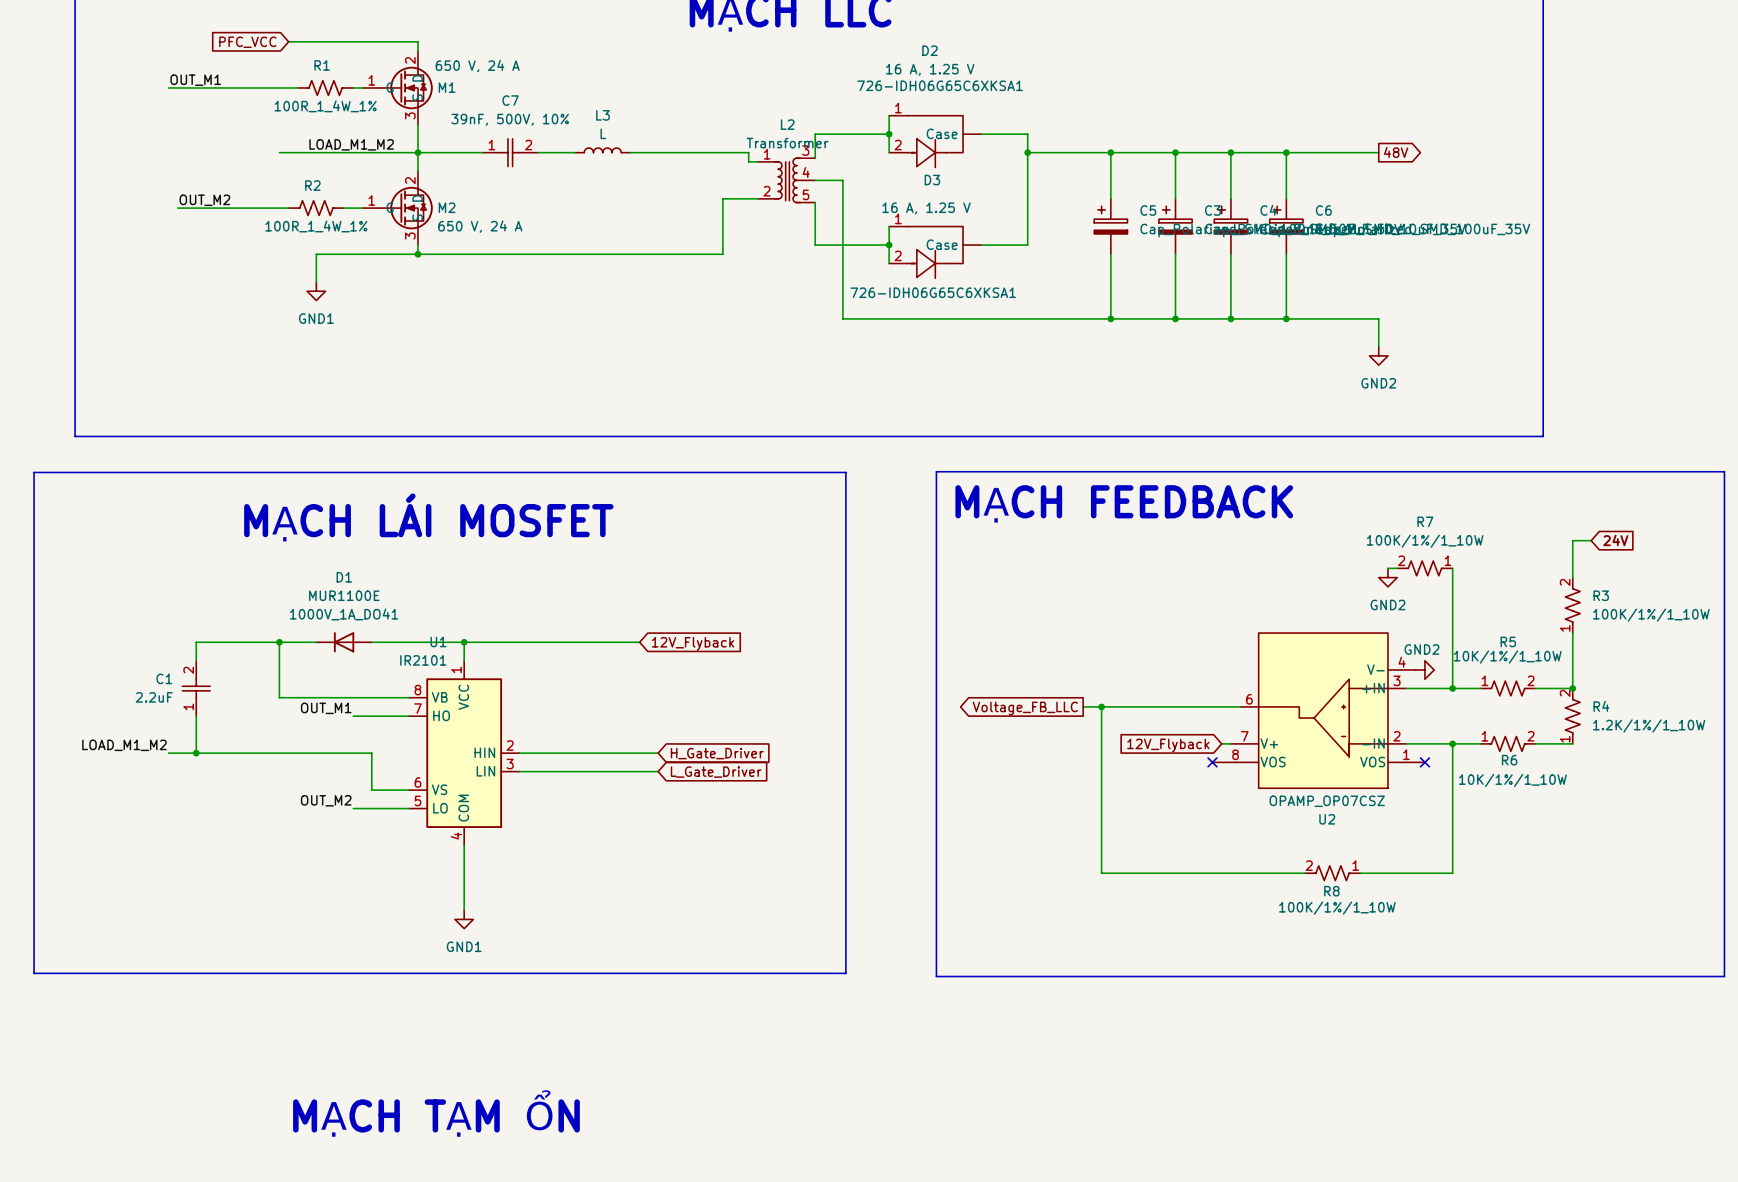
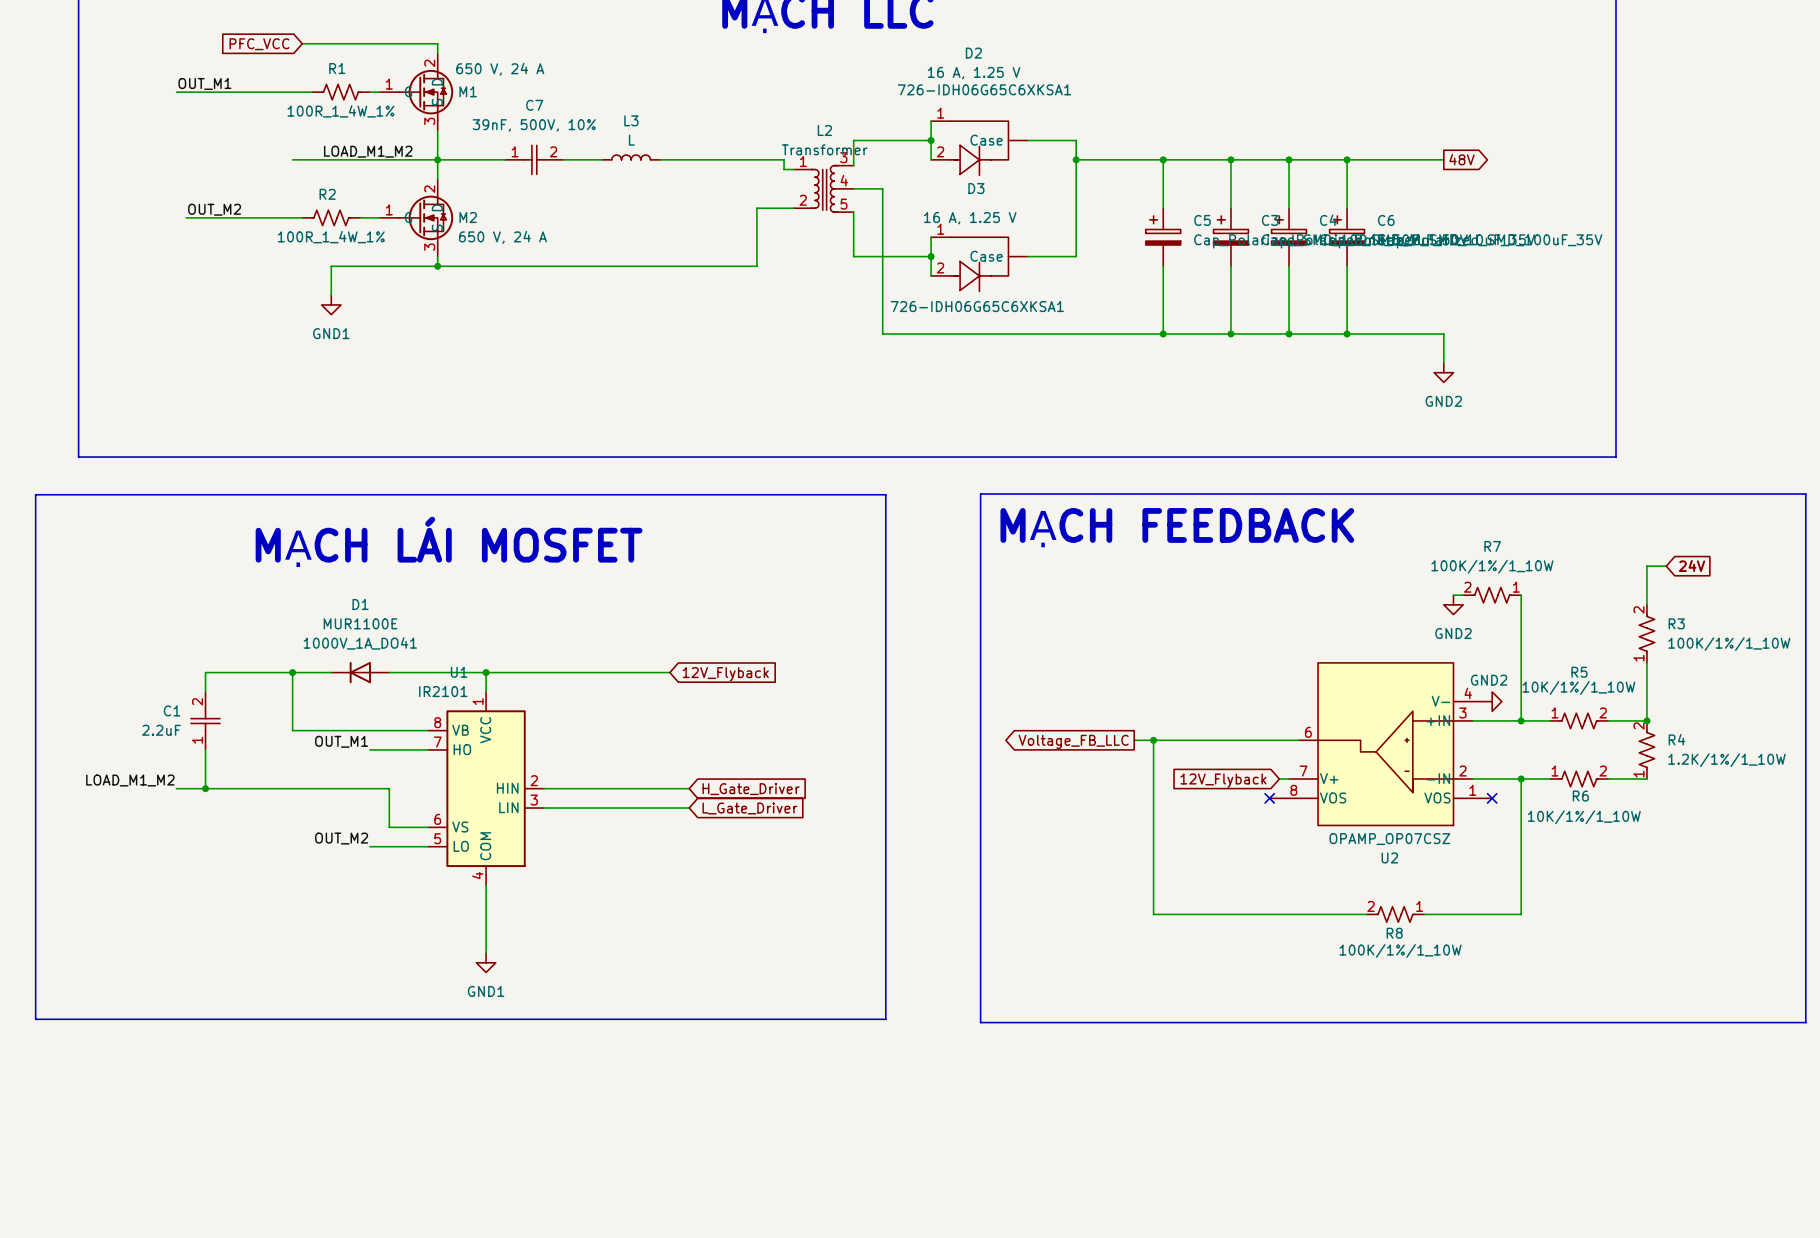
text: MẠCH TẠM ỔN (436, 1113) -> none

